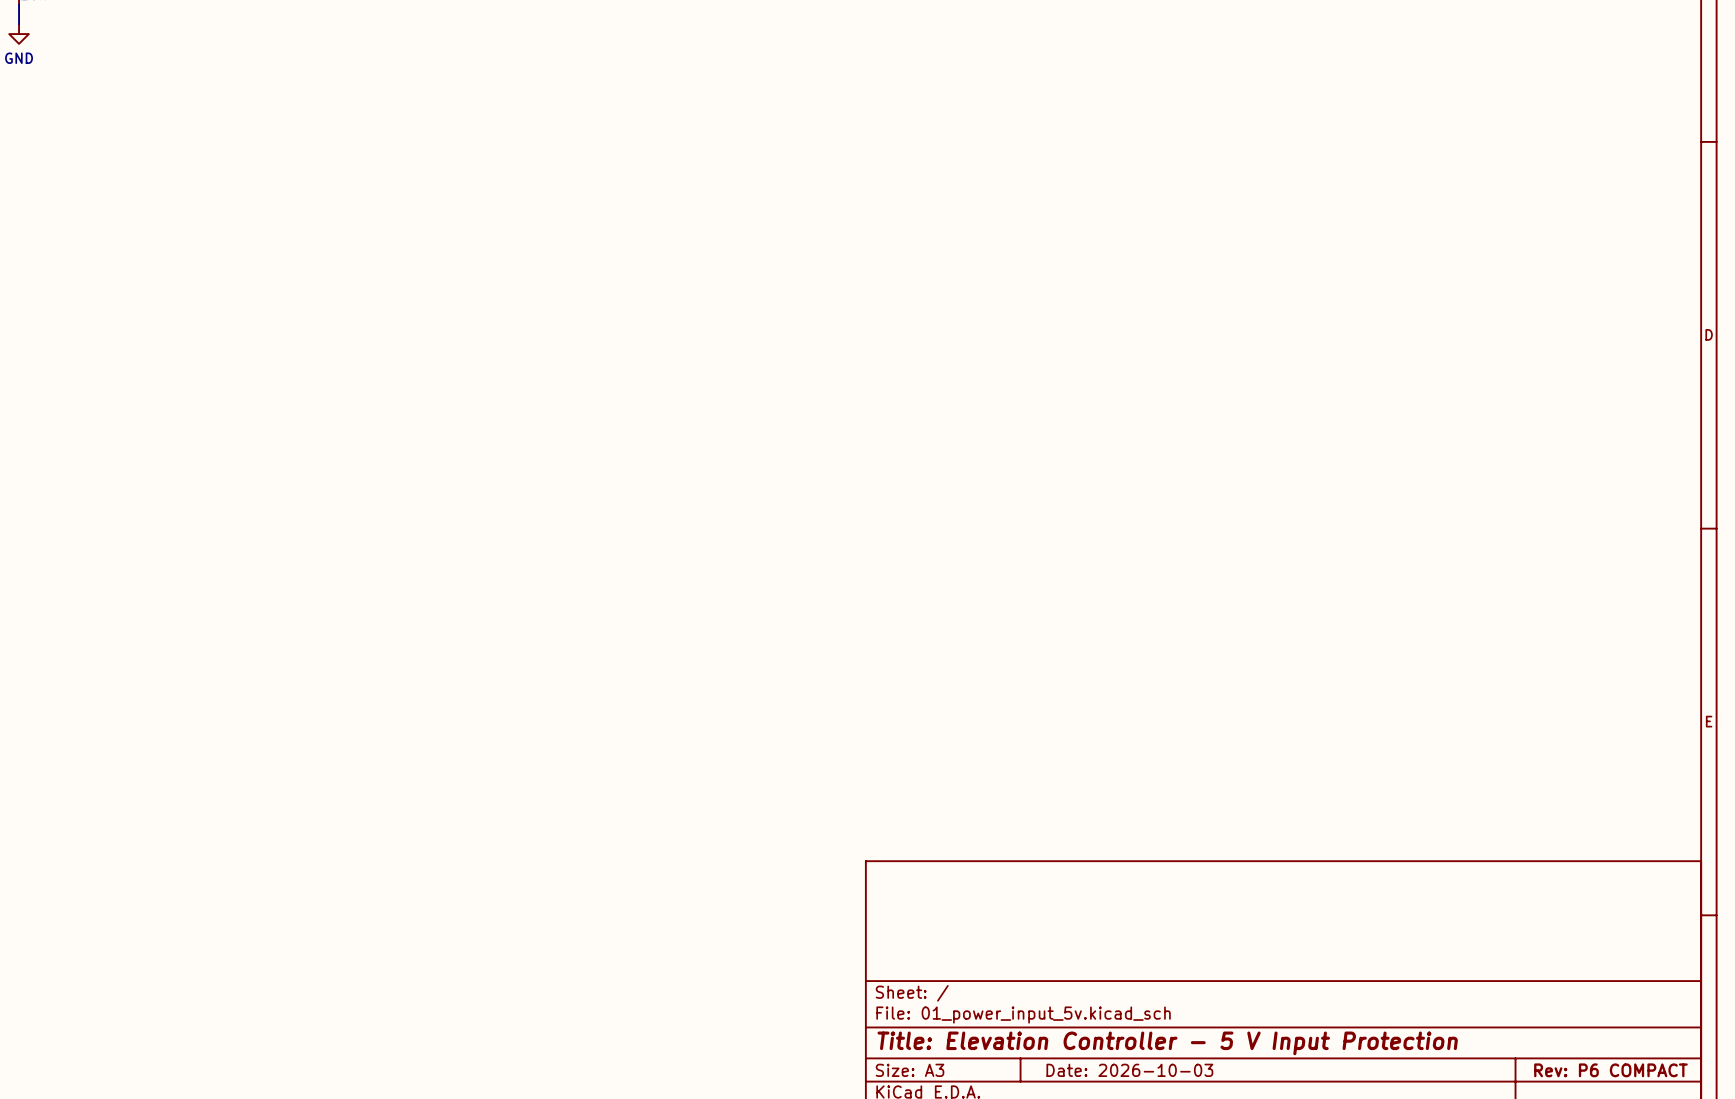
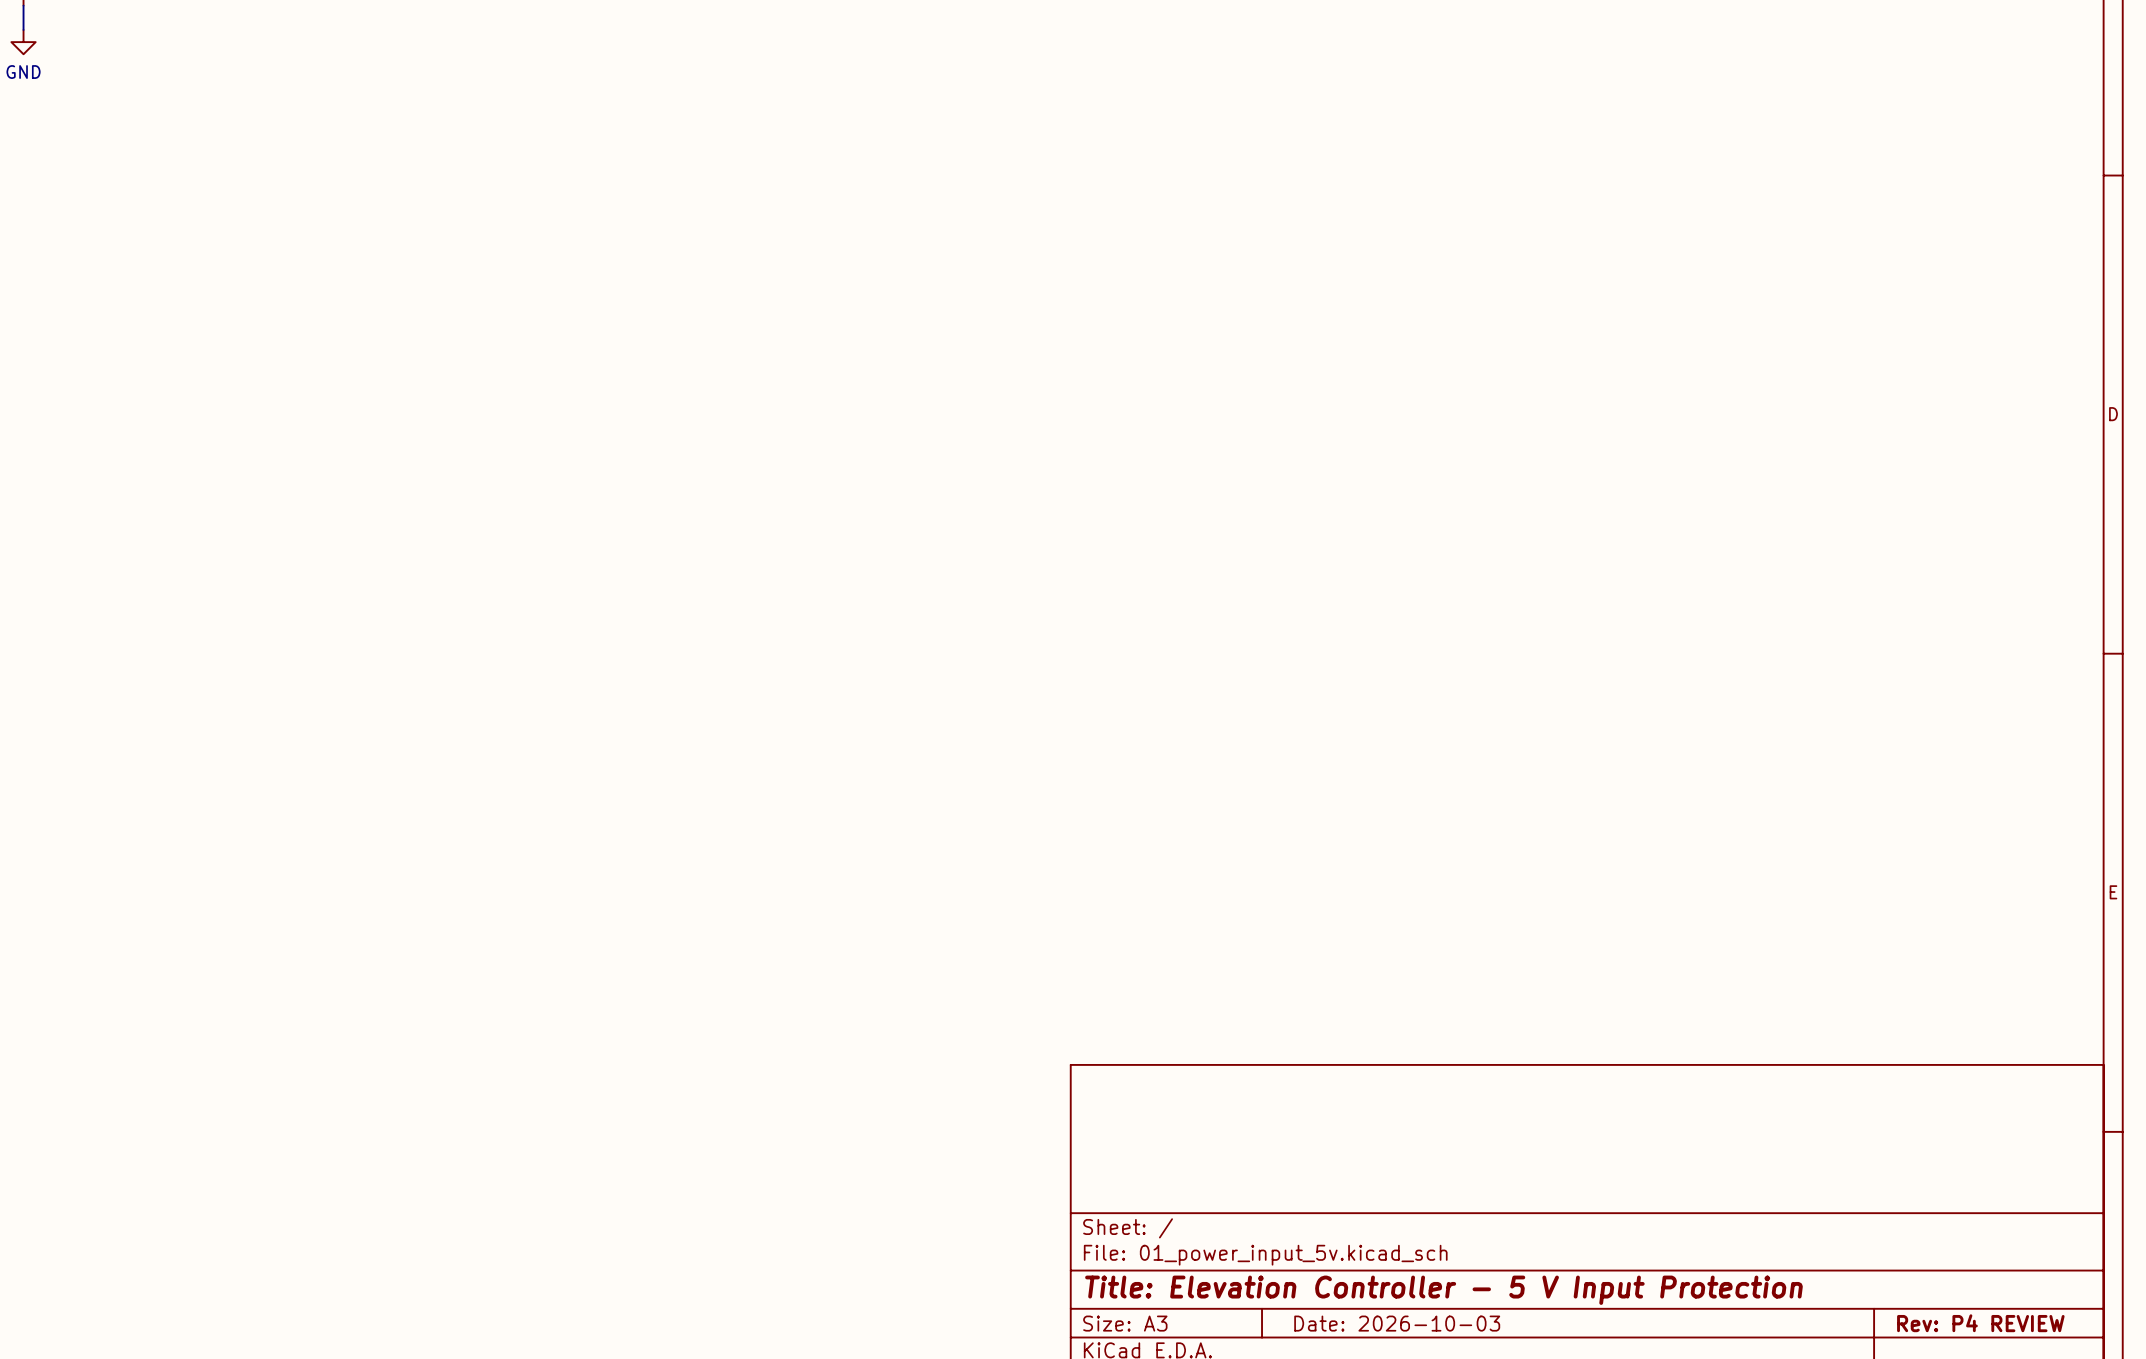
title block: Rev: P6 COMPACT (1610, 1070) -> Rev: P4 REVIEW (1980, 1323)

